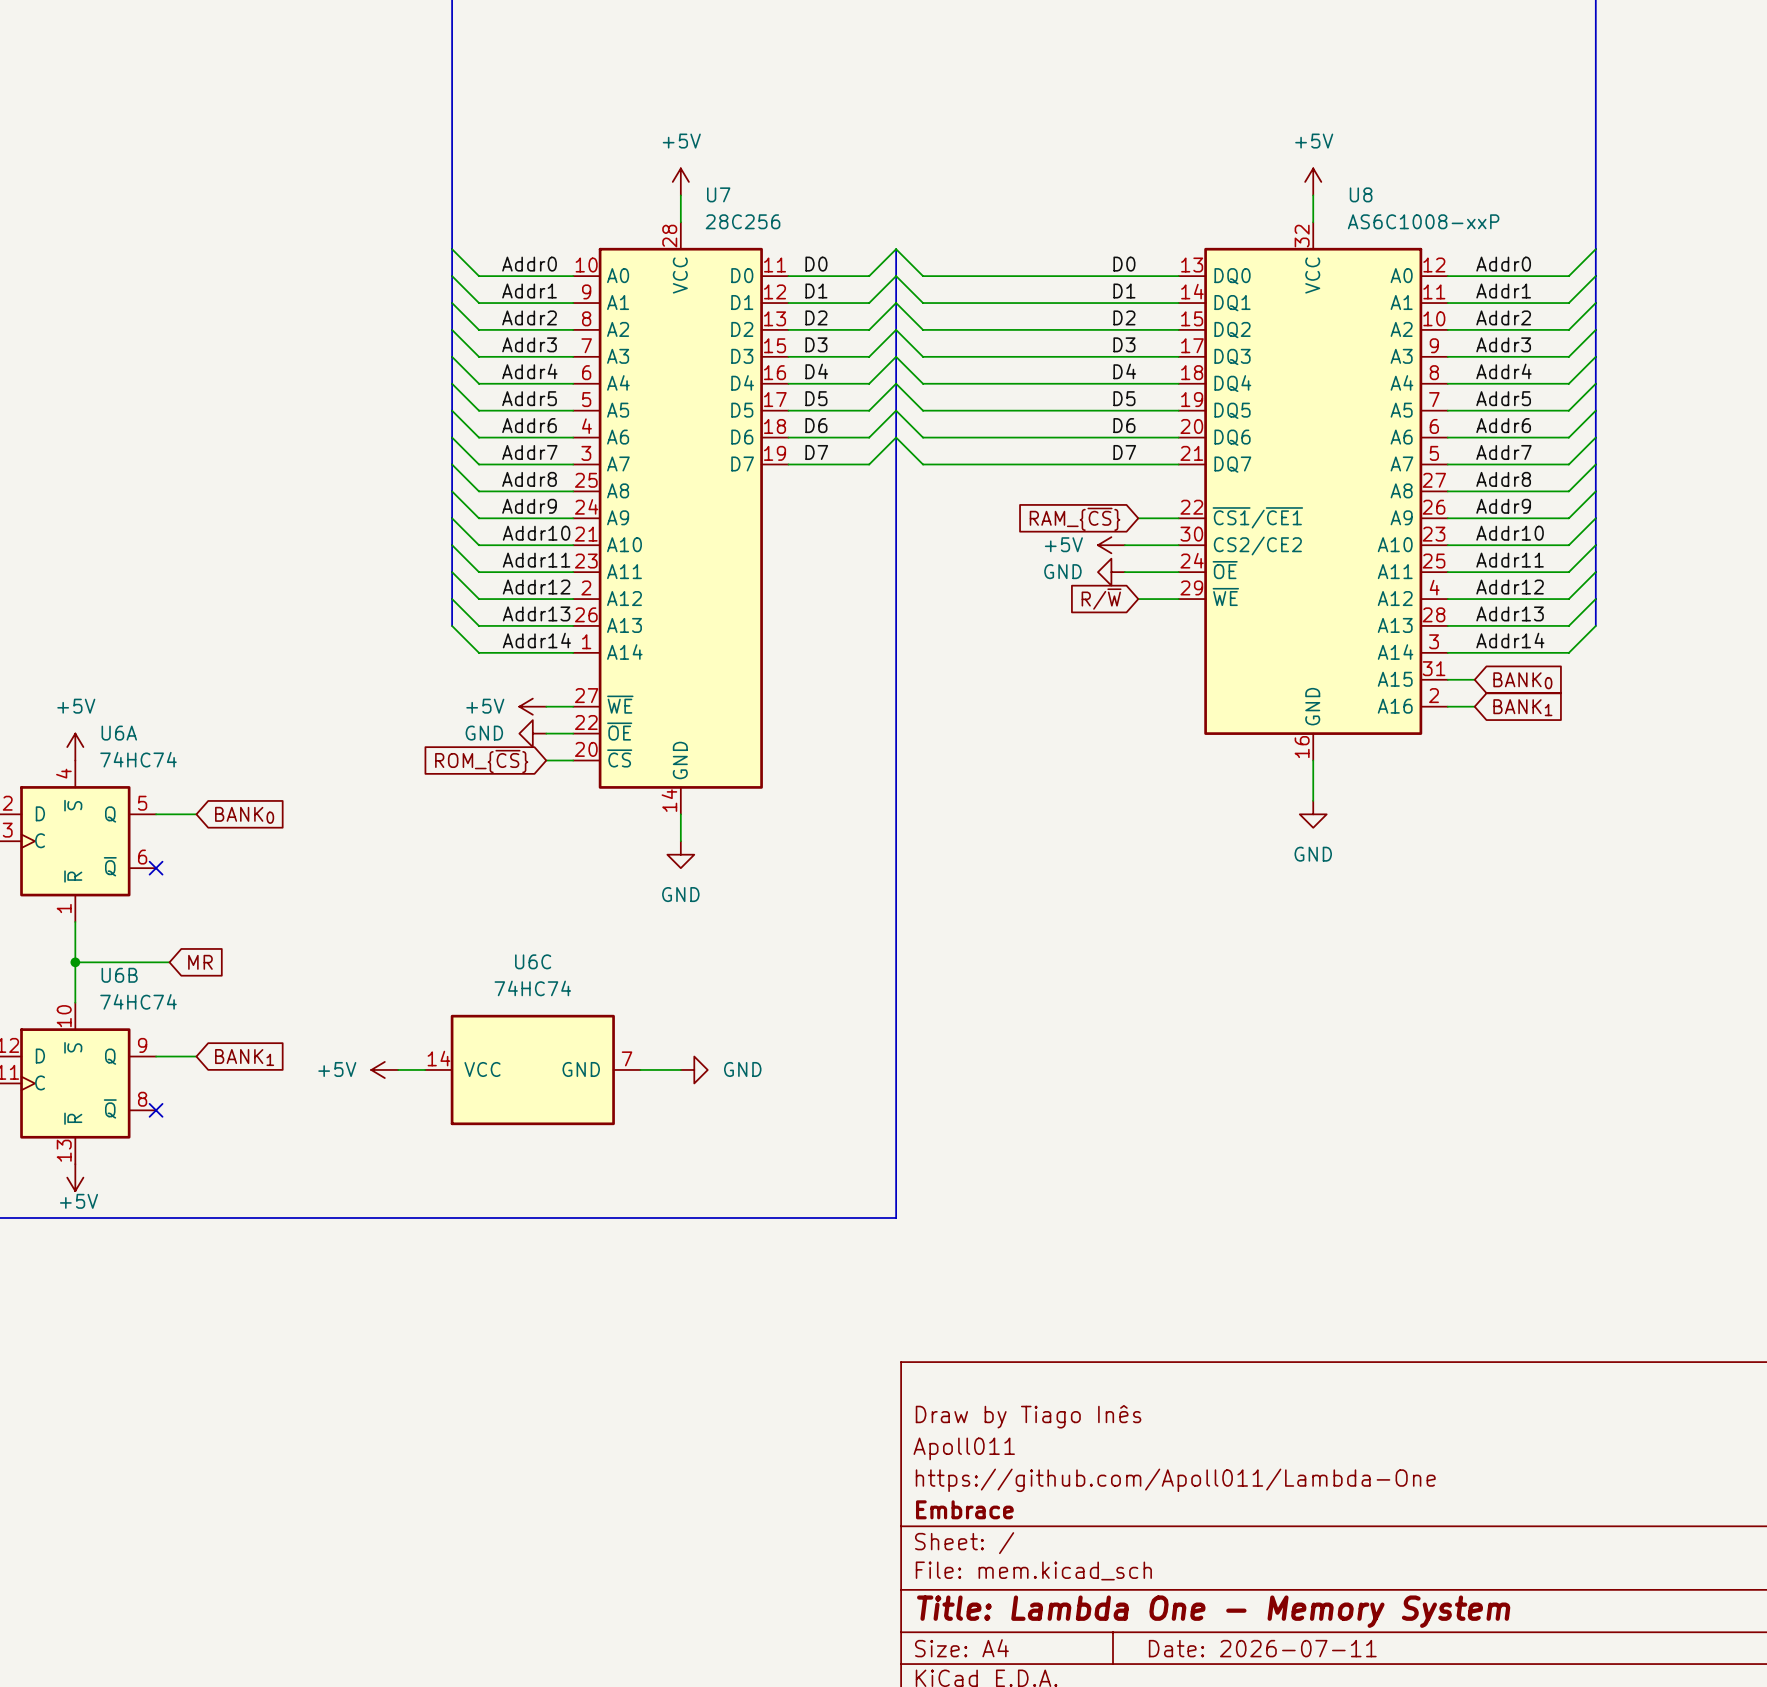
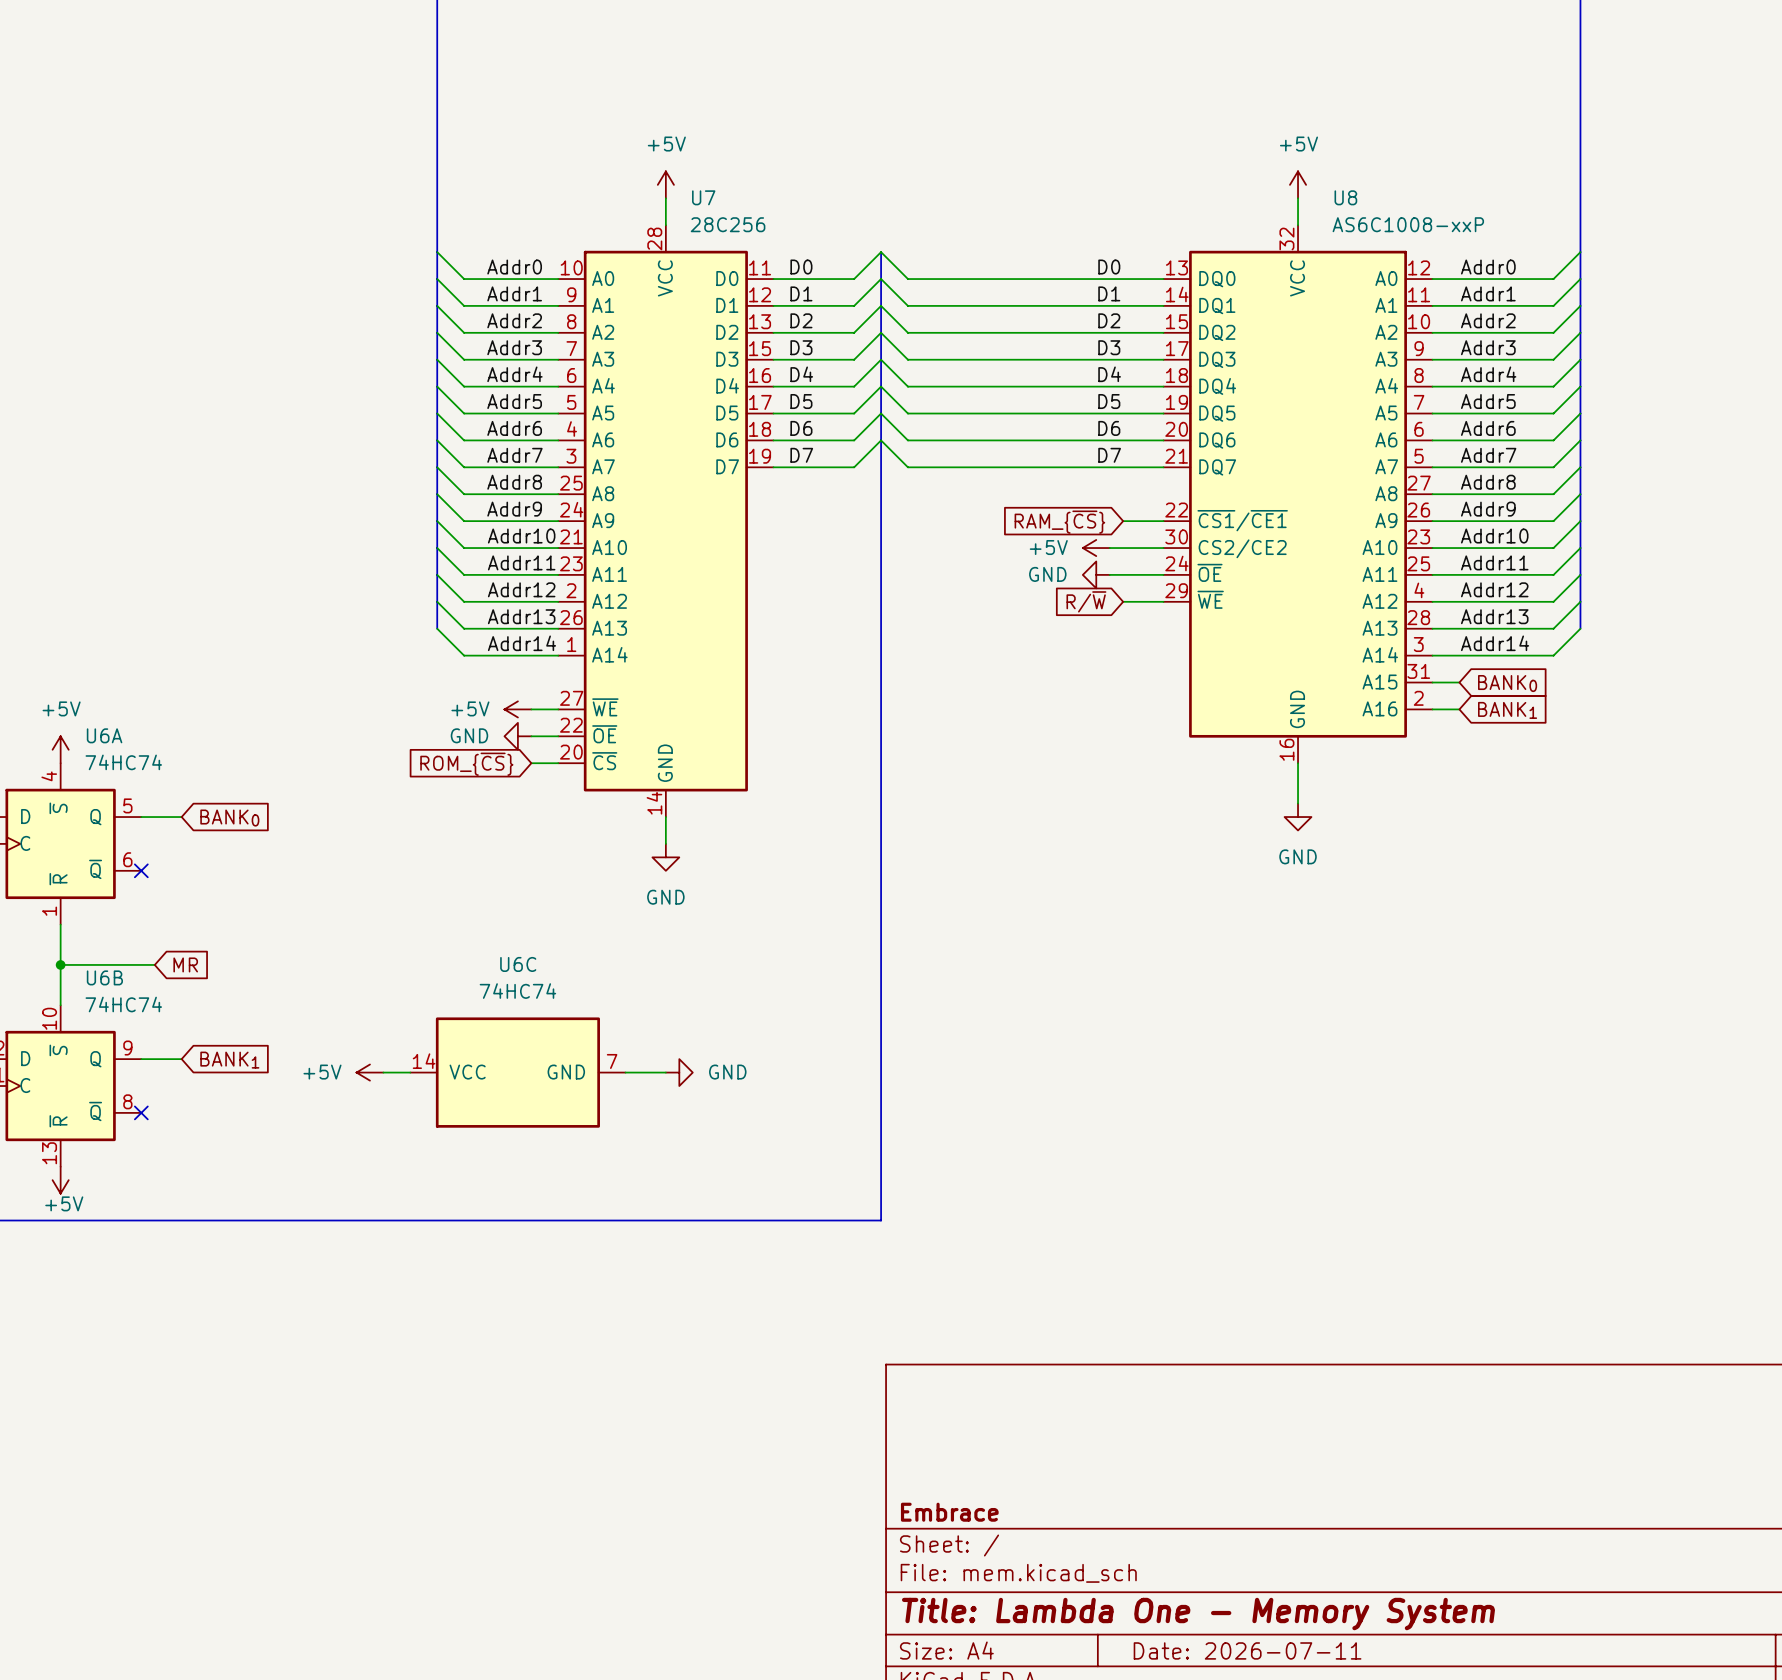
title block: Draw by Tiago Inês (1028, 1416) -> none
title block: Apoll011 (964, 1448) -> none
title block: https://github.com/Apoll011/Lambda-One (1175, 1480) -> none

